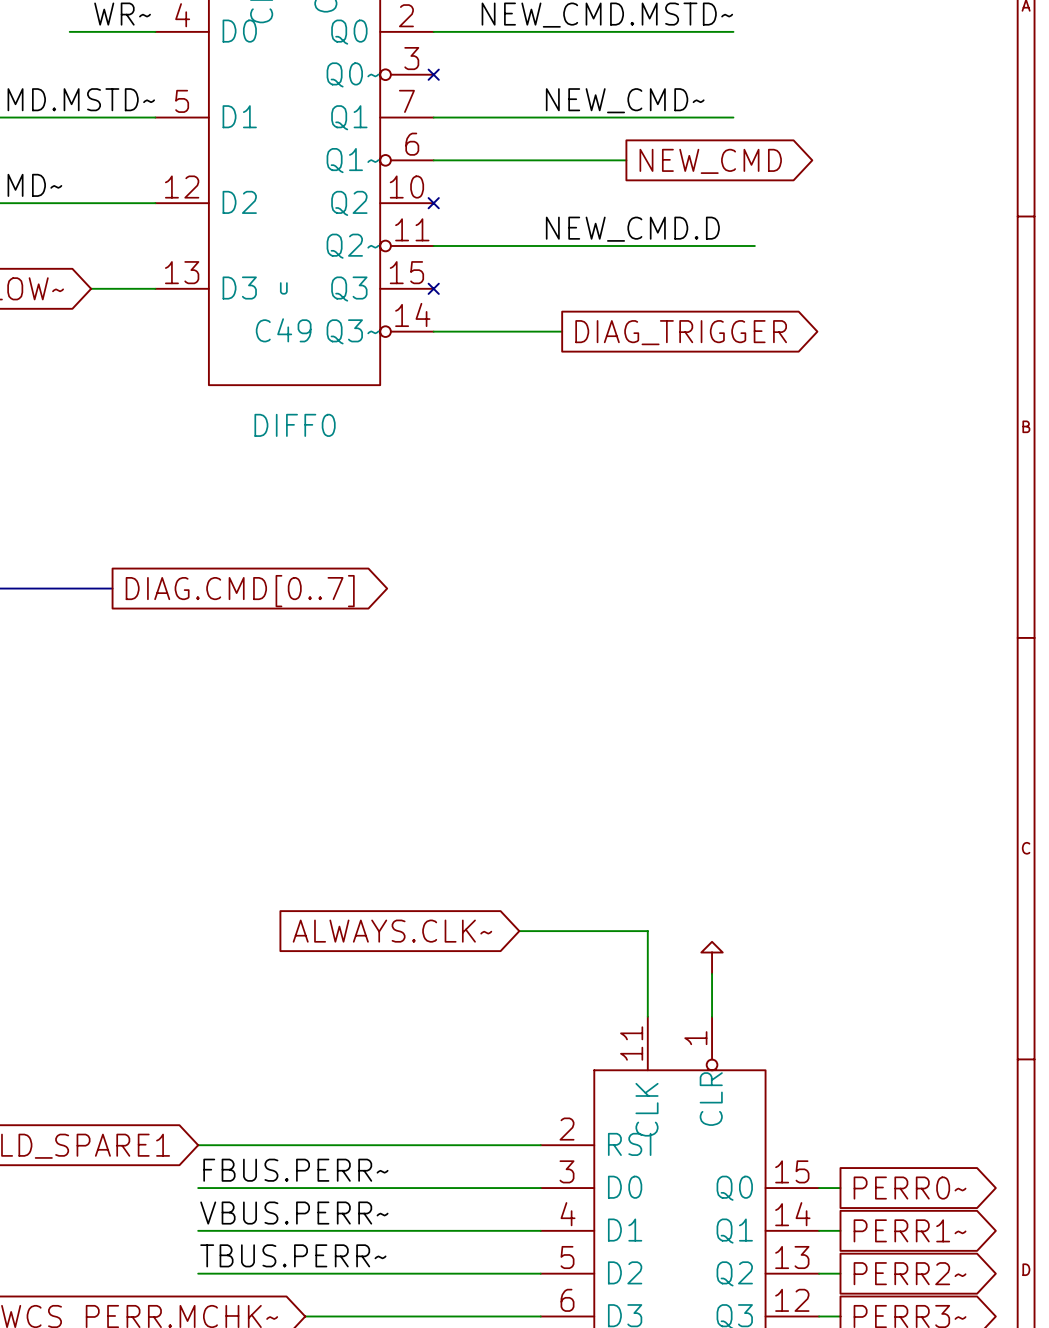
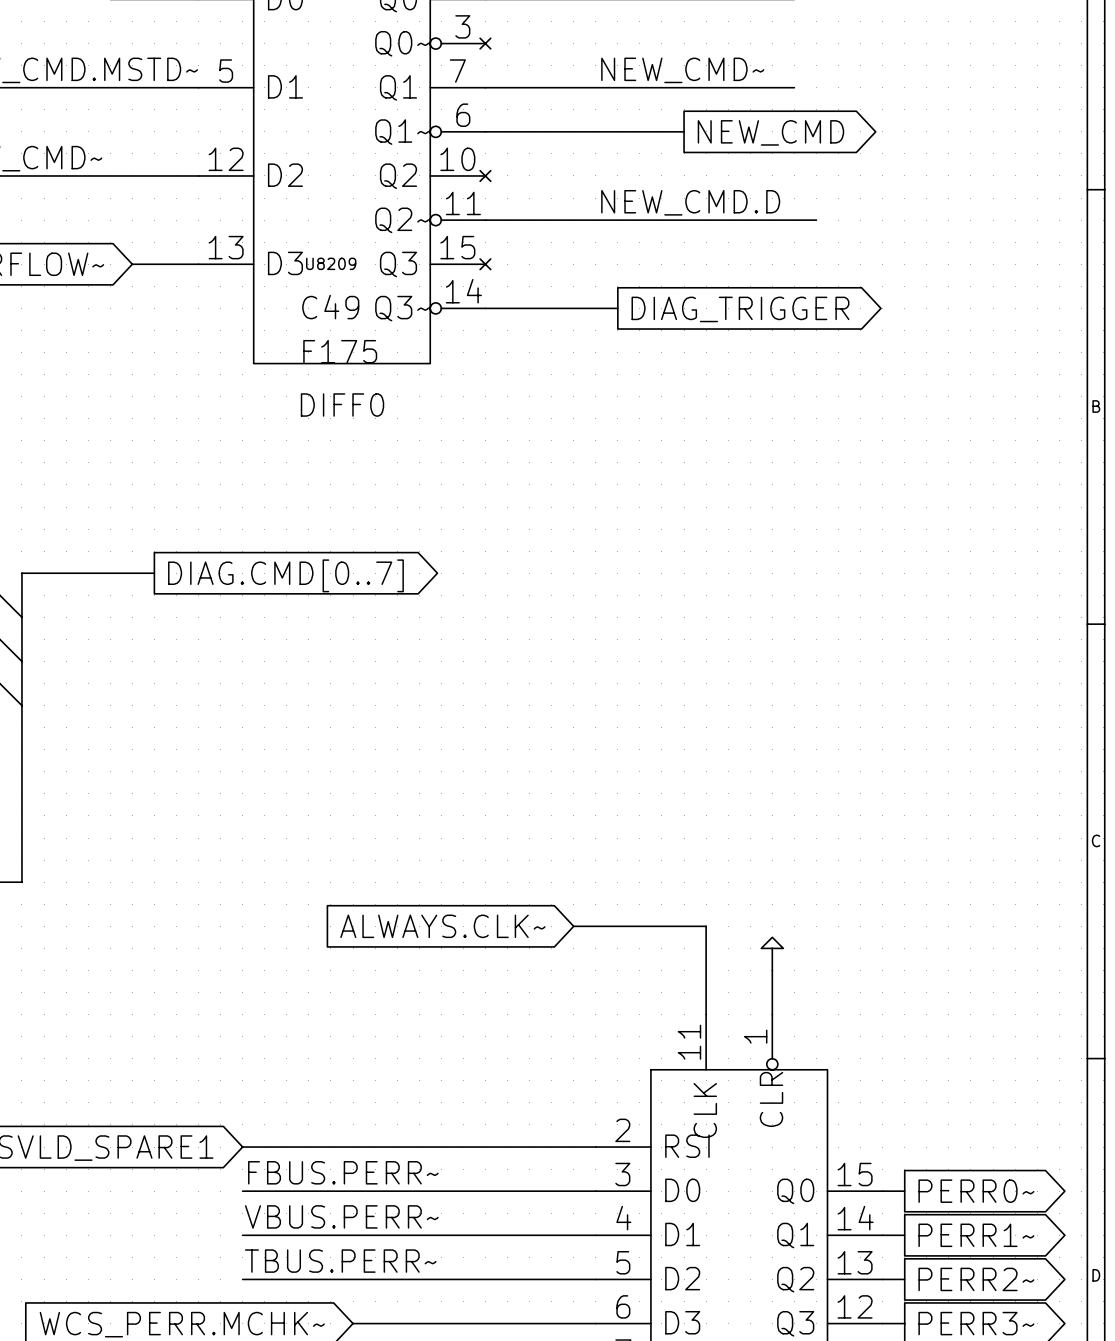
U name: U (283, 288) -> U8209 (331, 263)
U value: none -> F175 (340, 351)

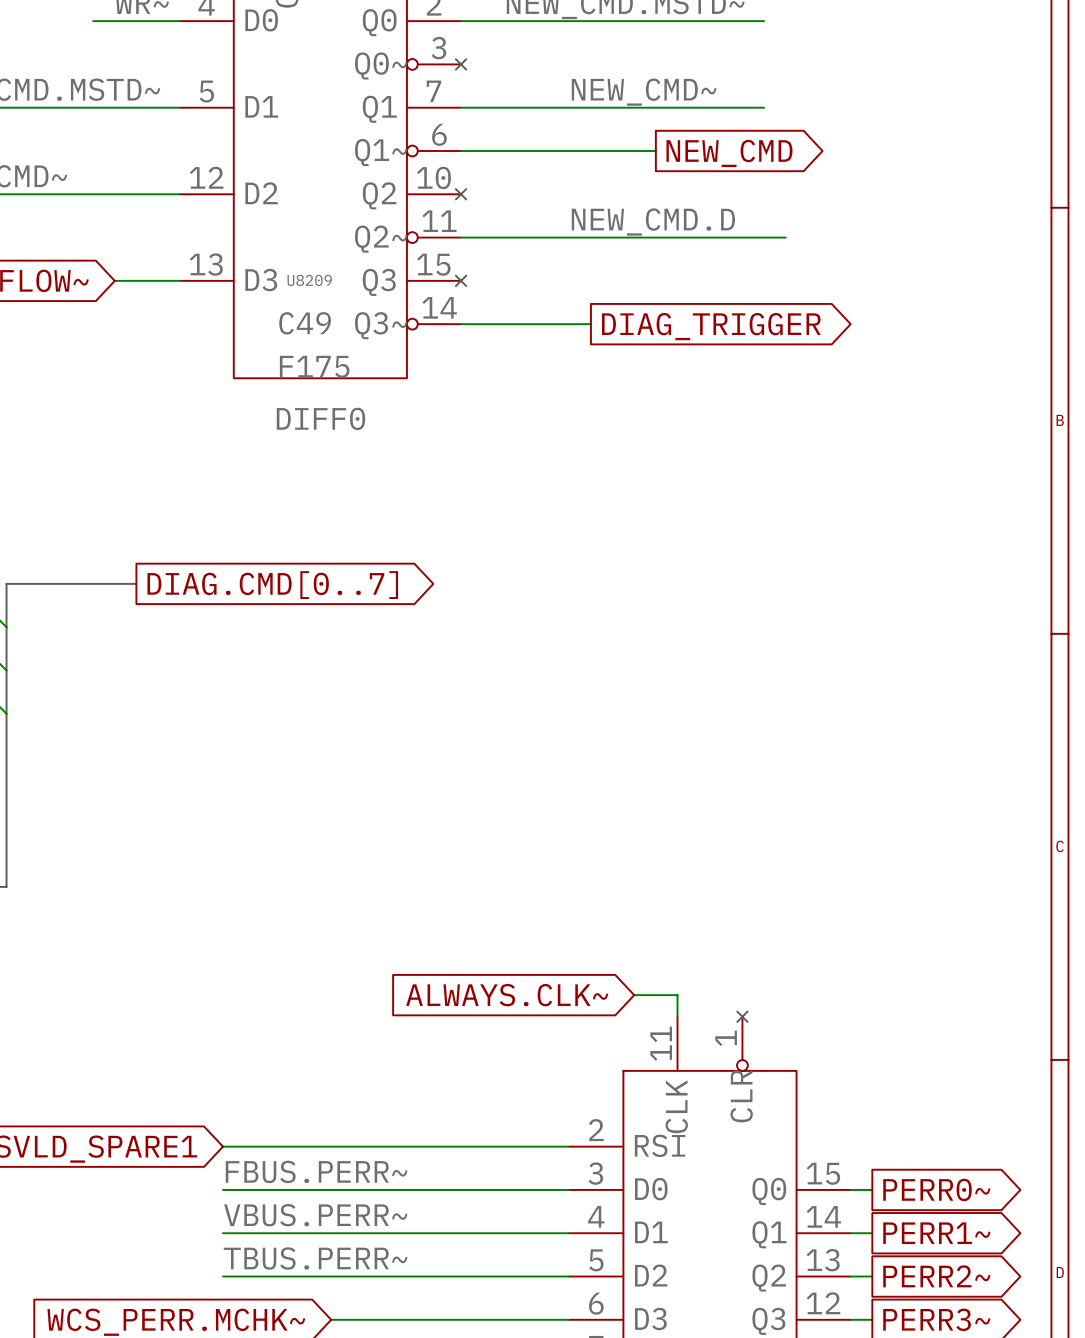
global label position: ALWAYS.CLK~ (442, 926) -> ALWAYS.CLK~ (507, 995)
wire: (573, 926) (706, 926) (706, 992) -> (634, 995) (677, 995)
power symbol: (772, 953) -> none
wire: (772, 970) (772, 1014) -> none
no-connect mark: none -> (742, 1016)

